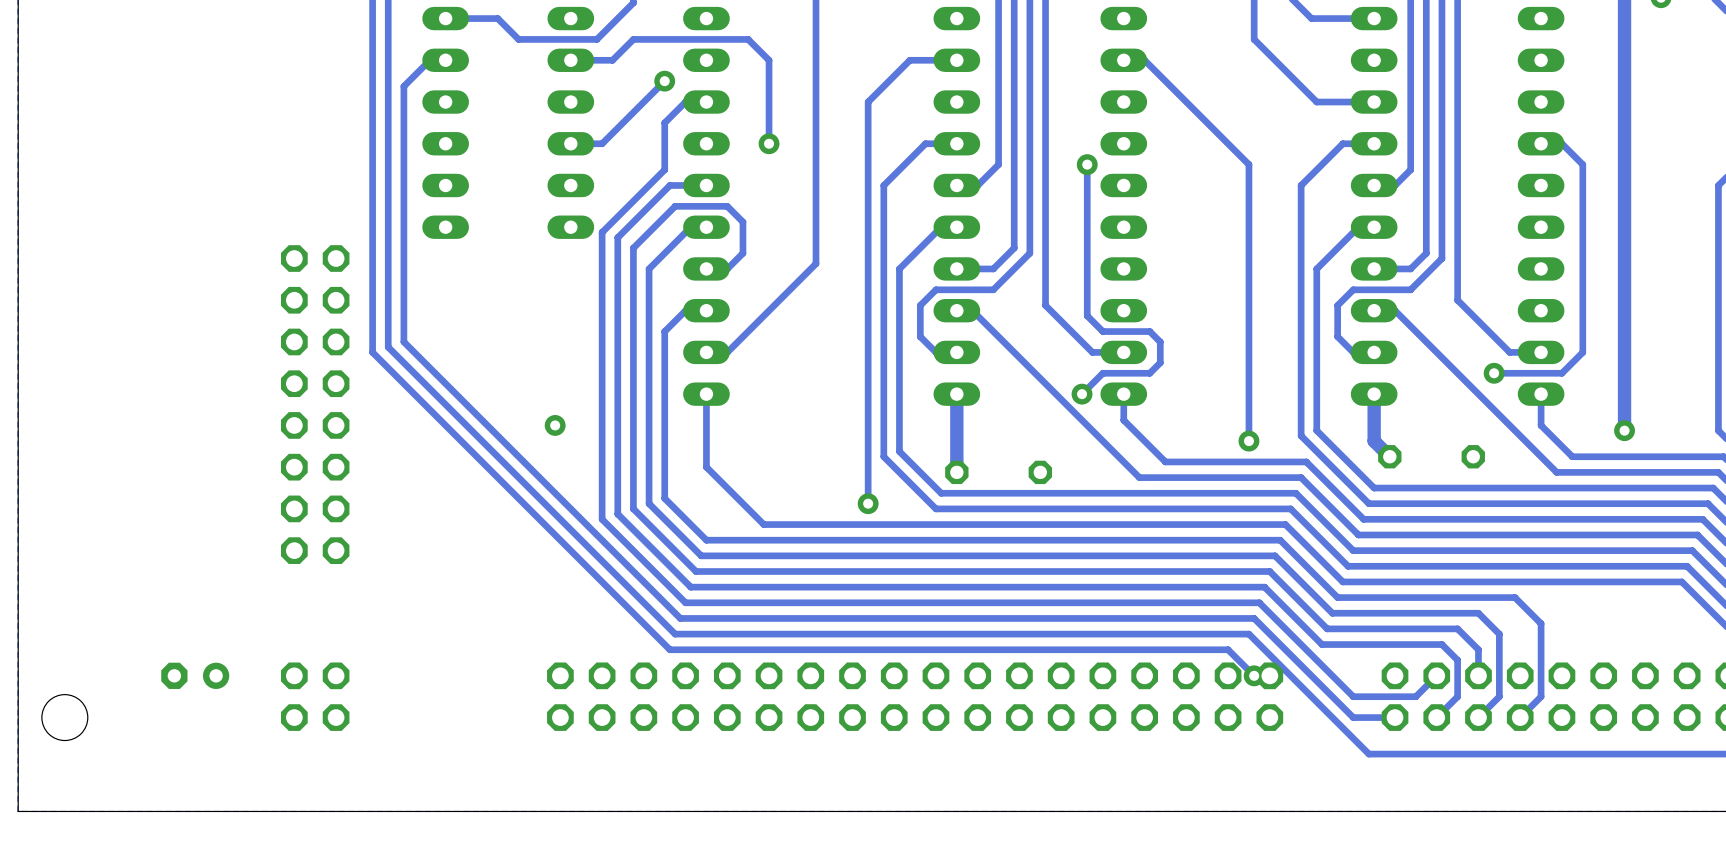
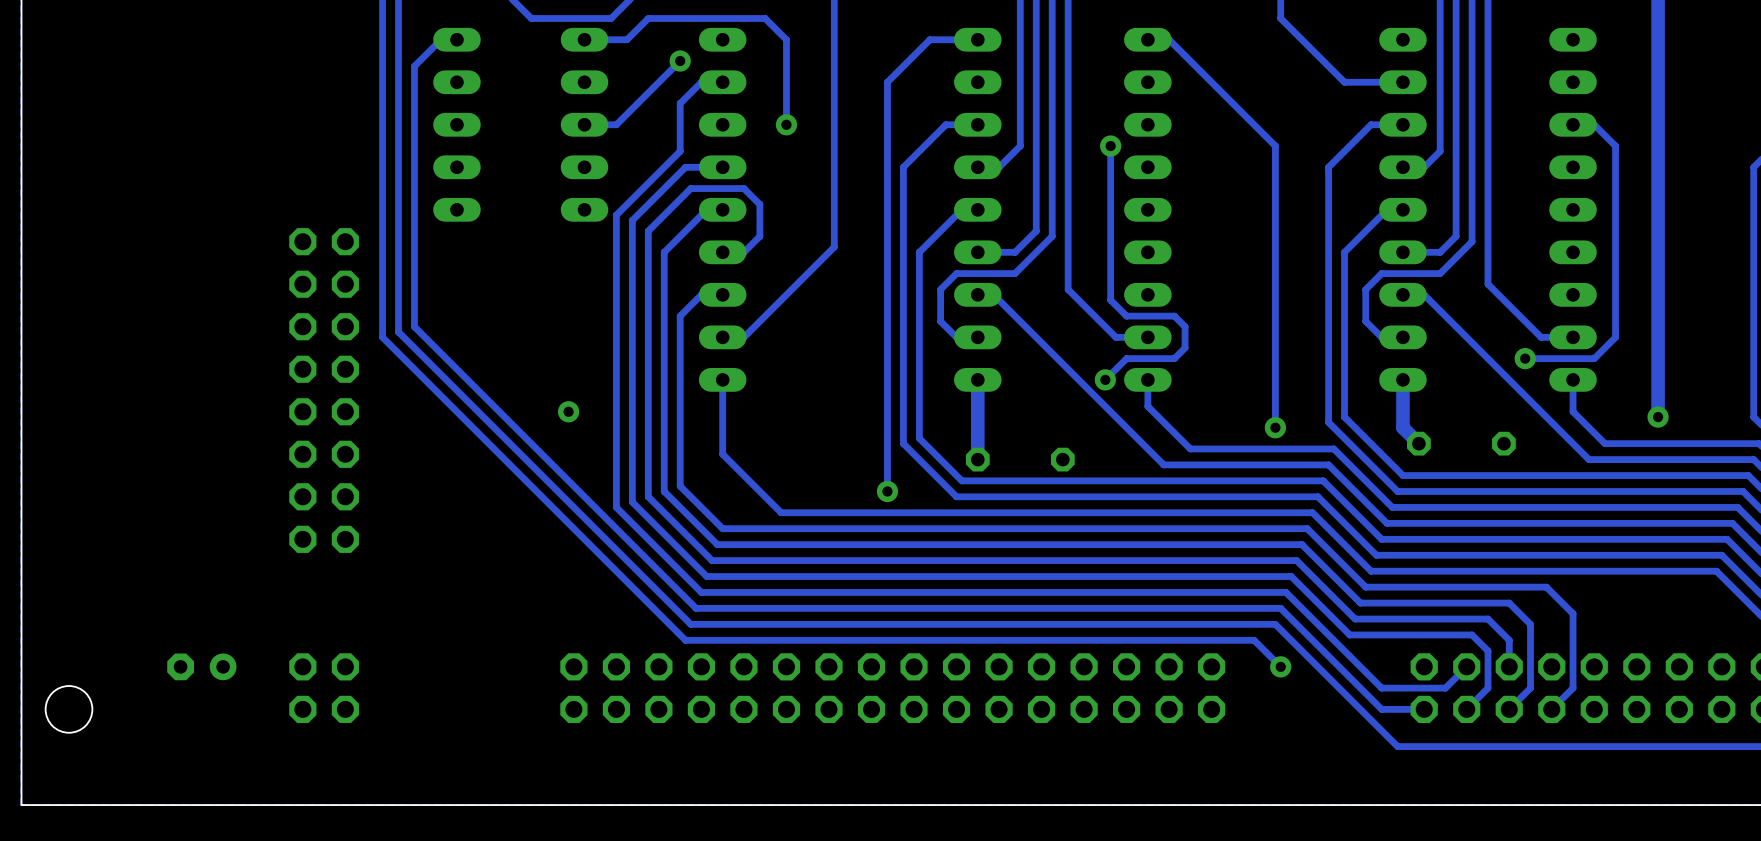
part: (915, 696) -> none

